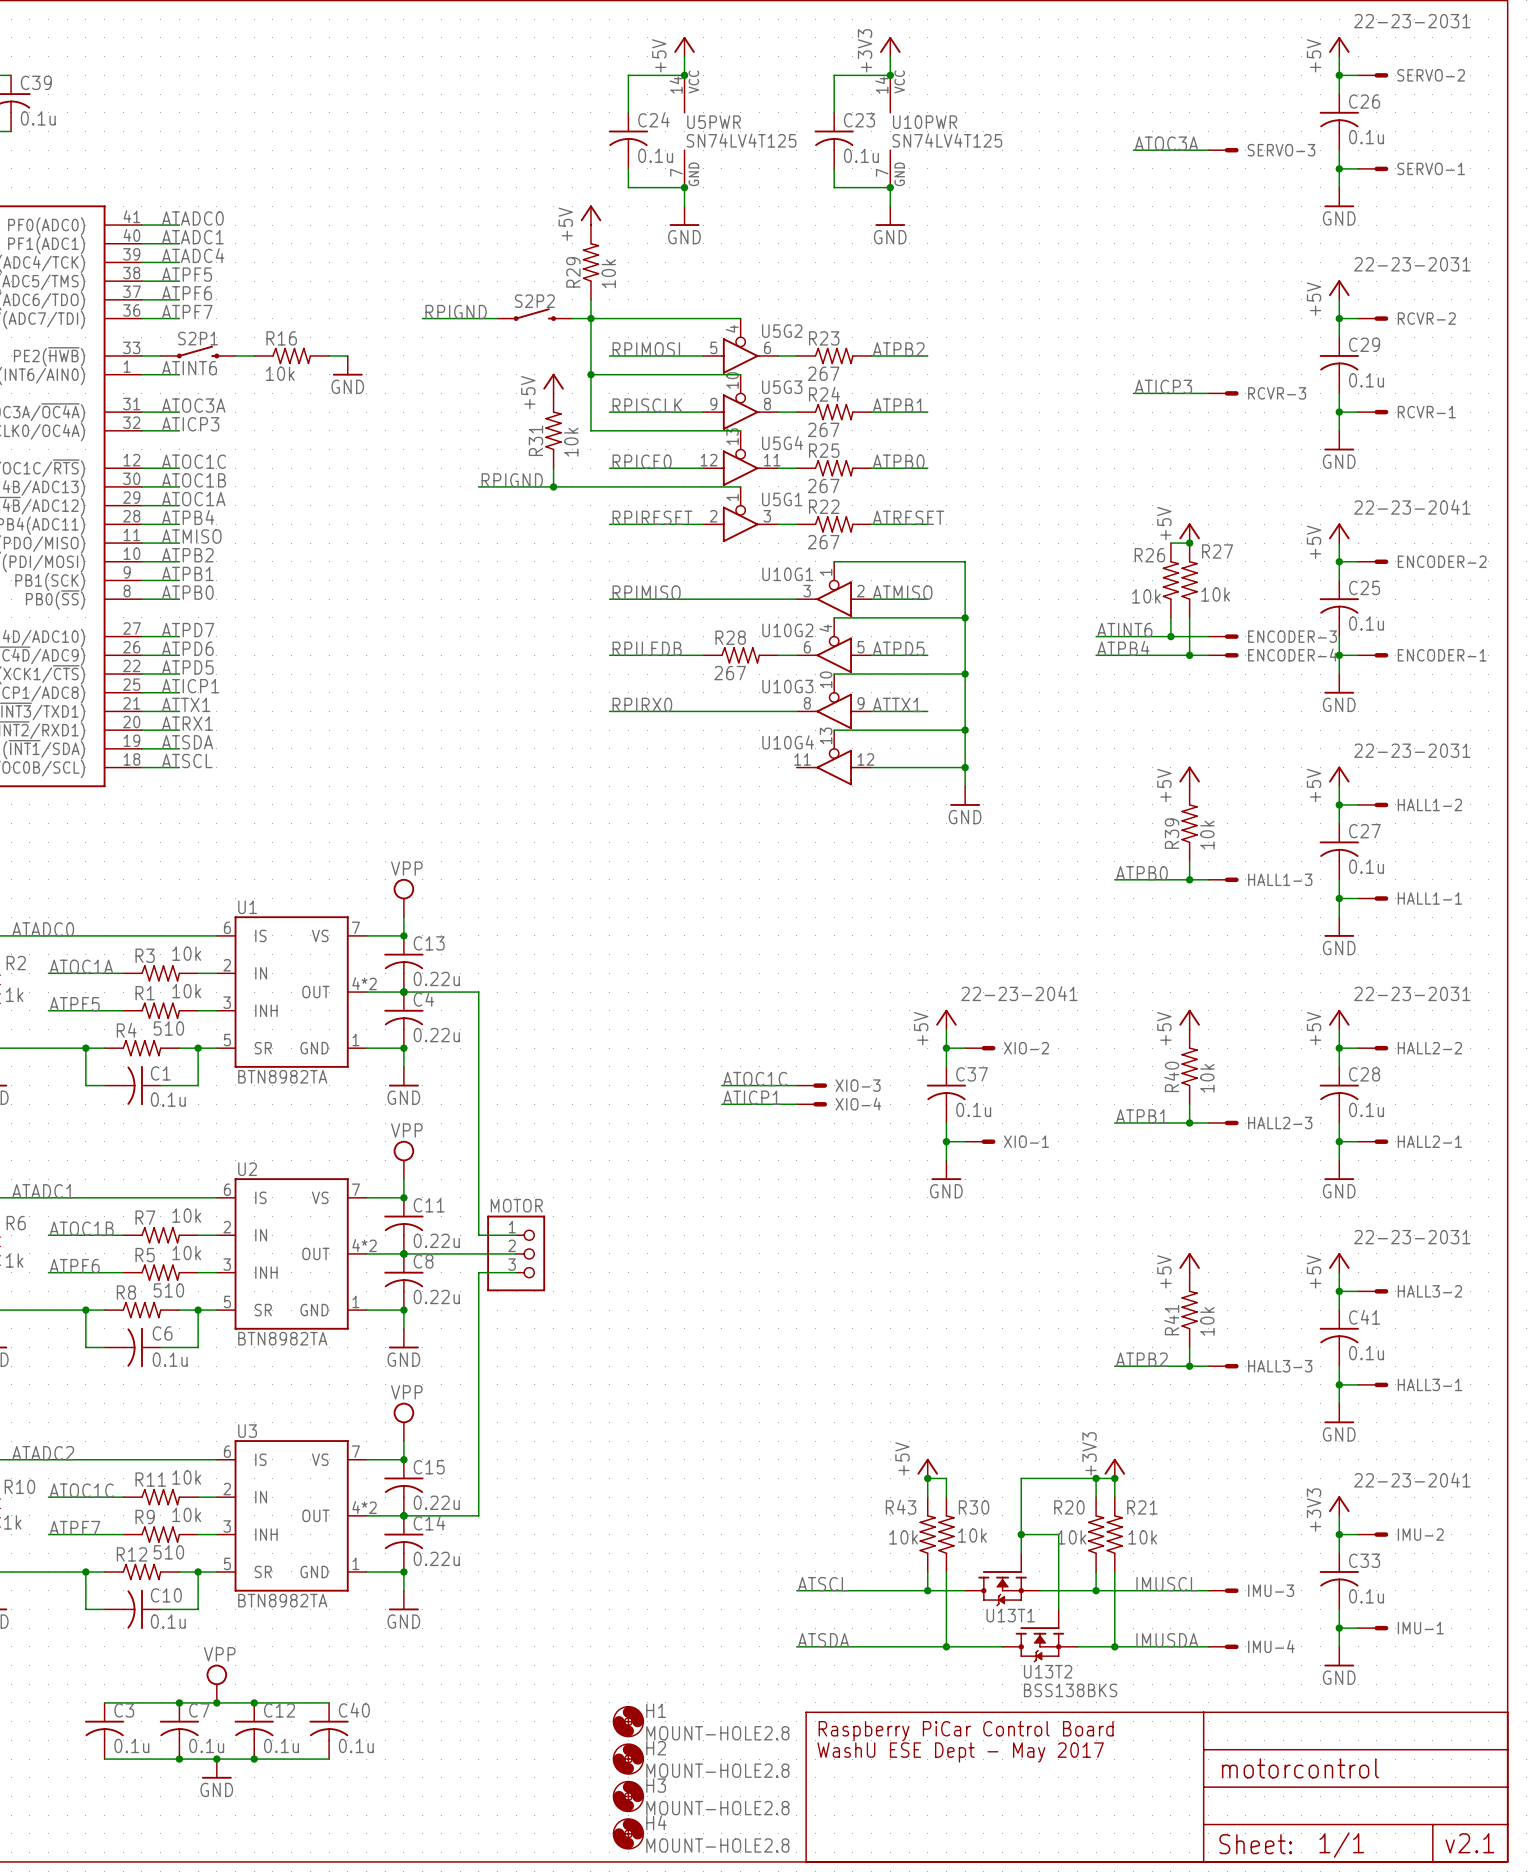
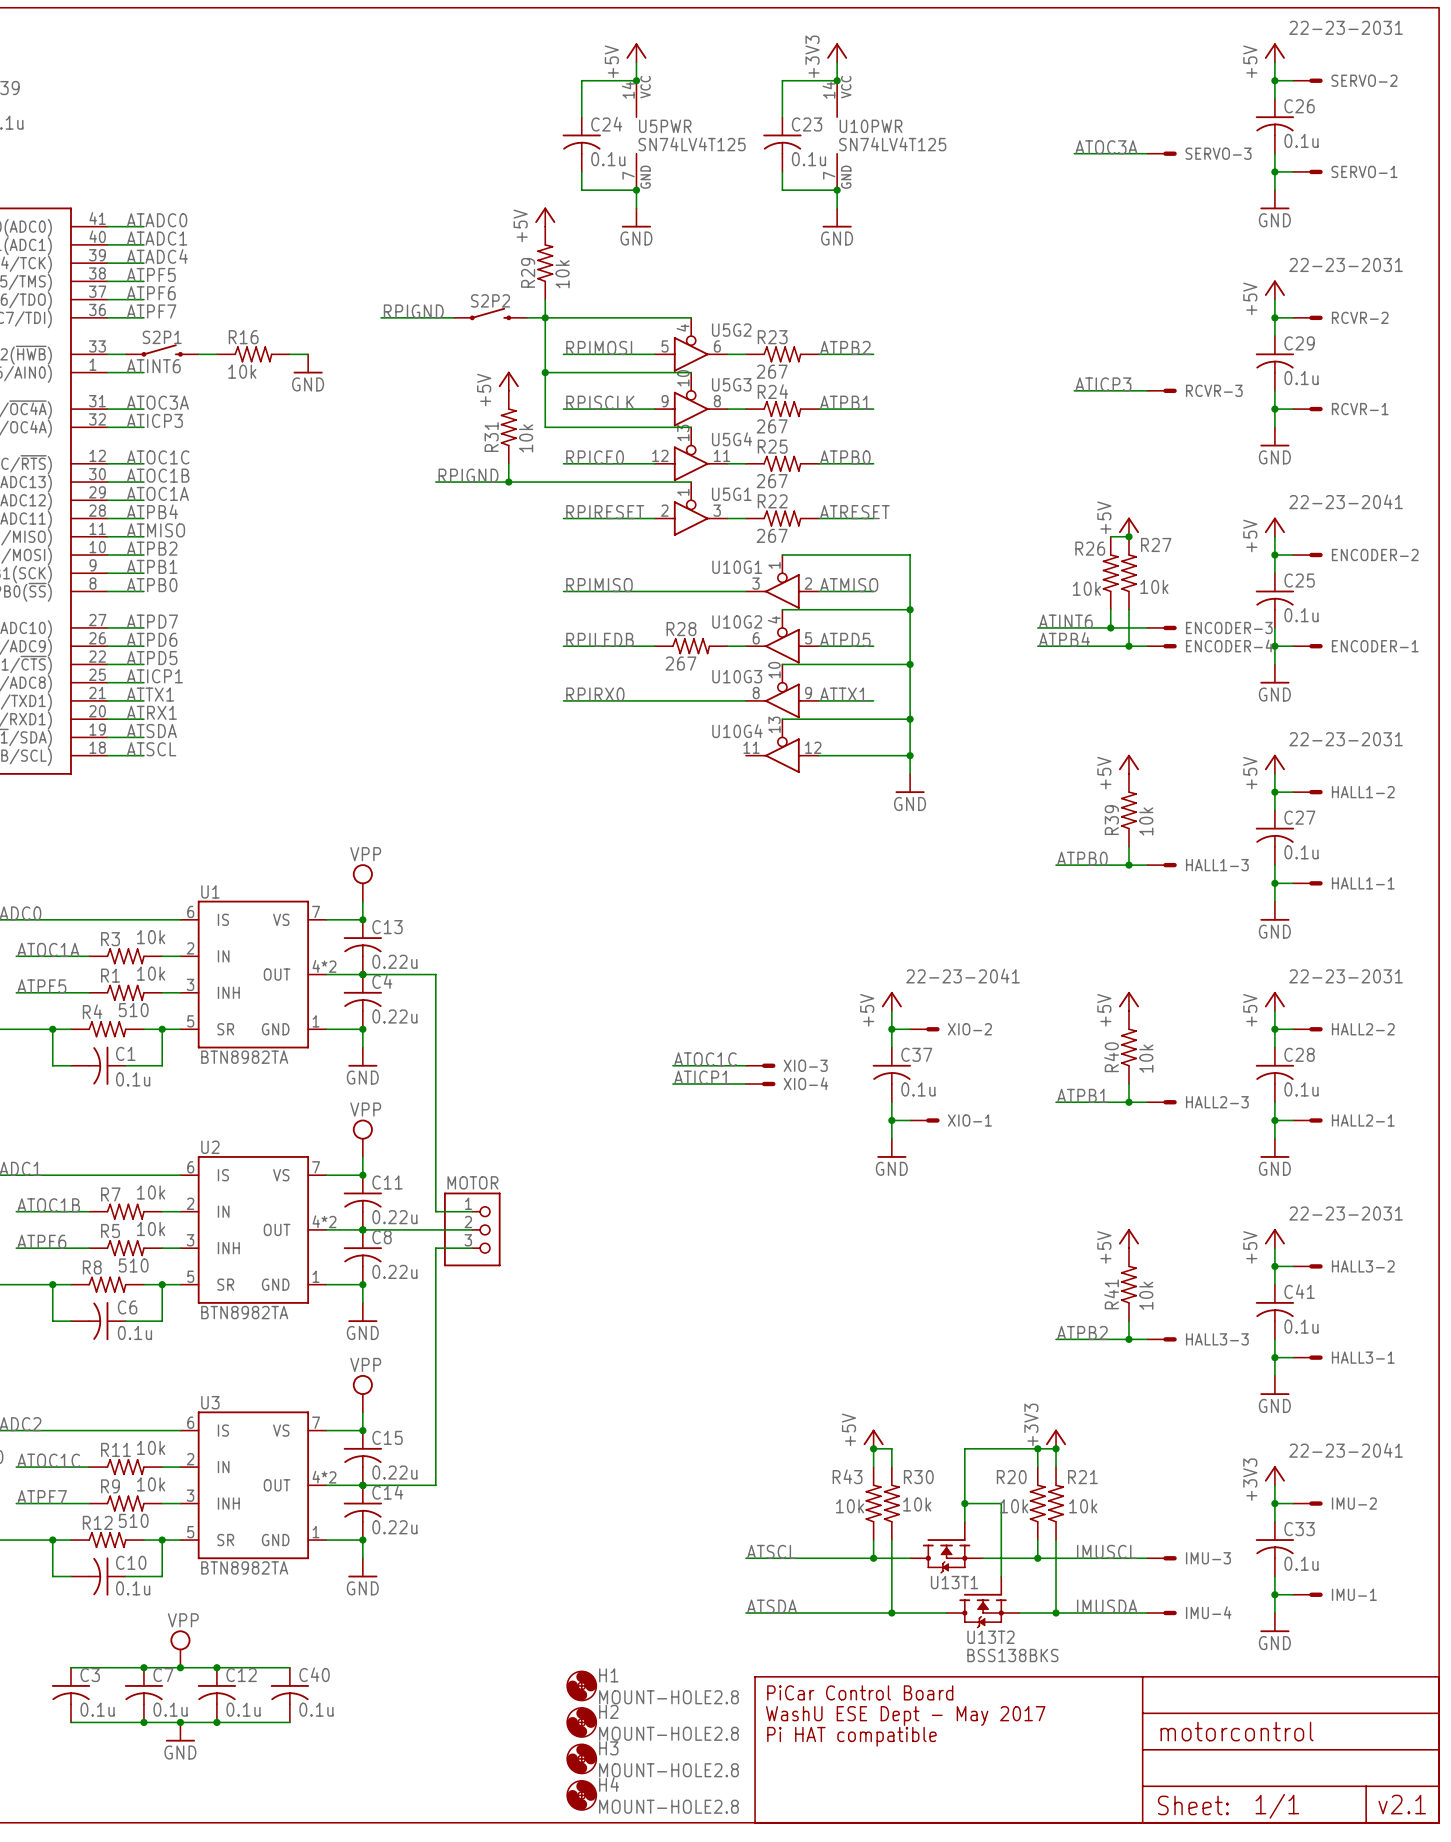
text: Raspberry PiCar Control Board (966, 1731) -> PiCar Control Board (860, 1692)
text: none -> Pi HAT compatible (851, 1736)

